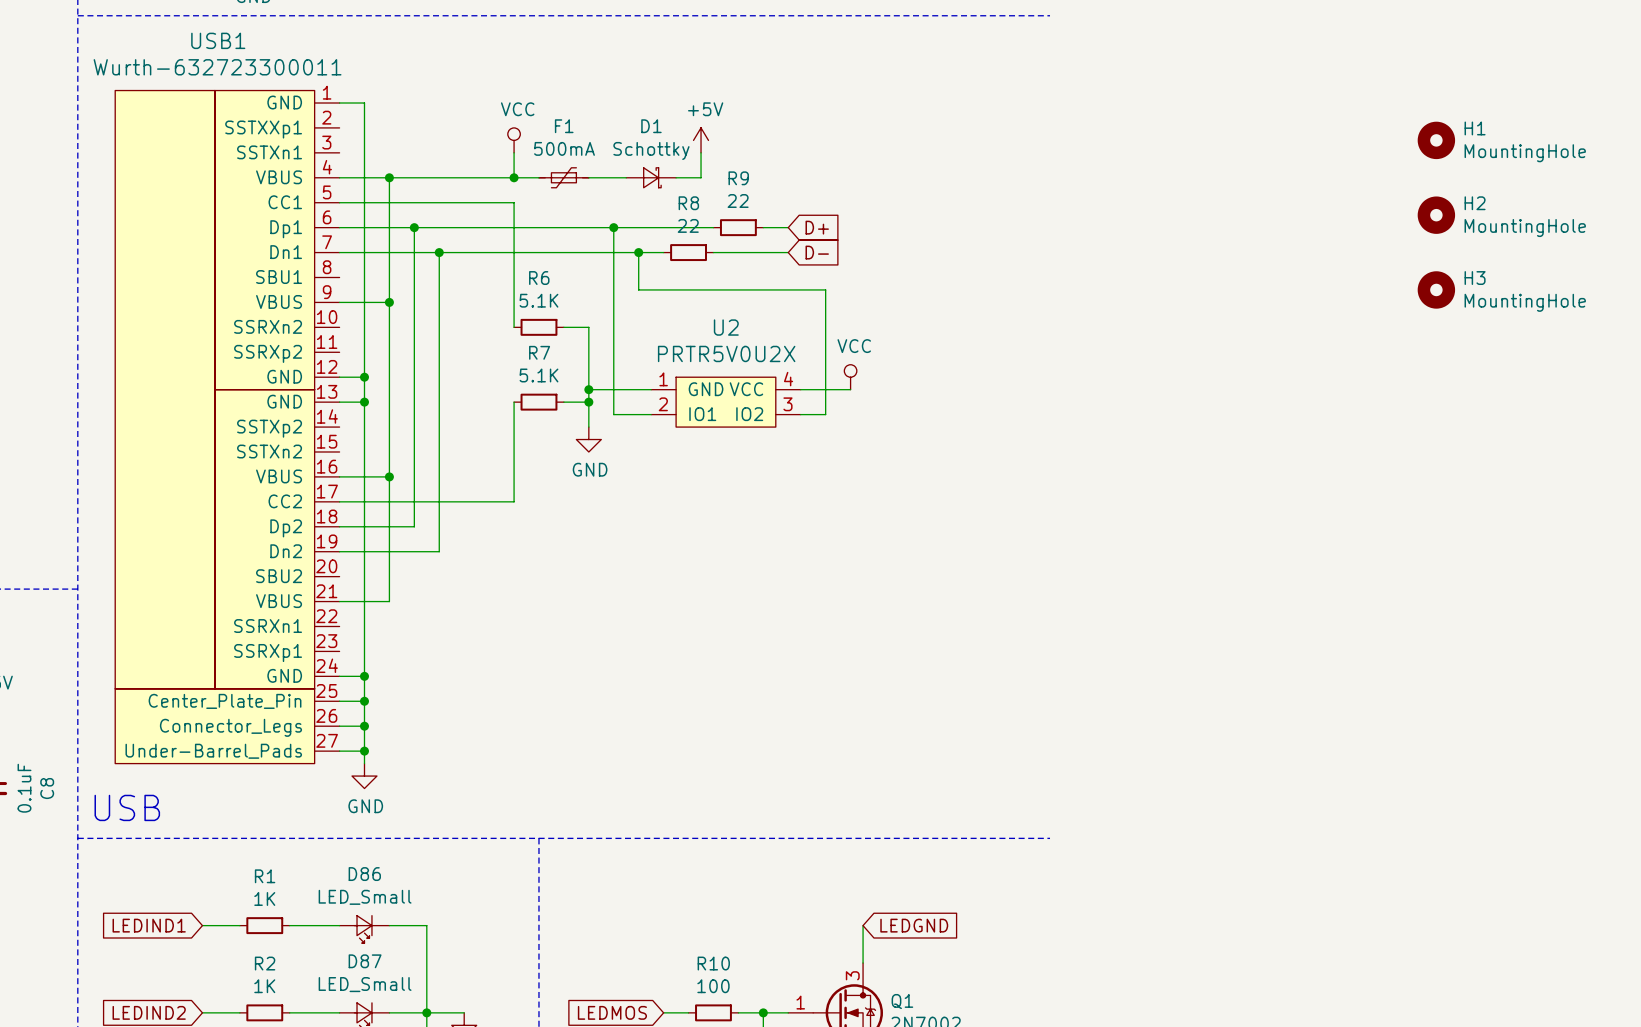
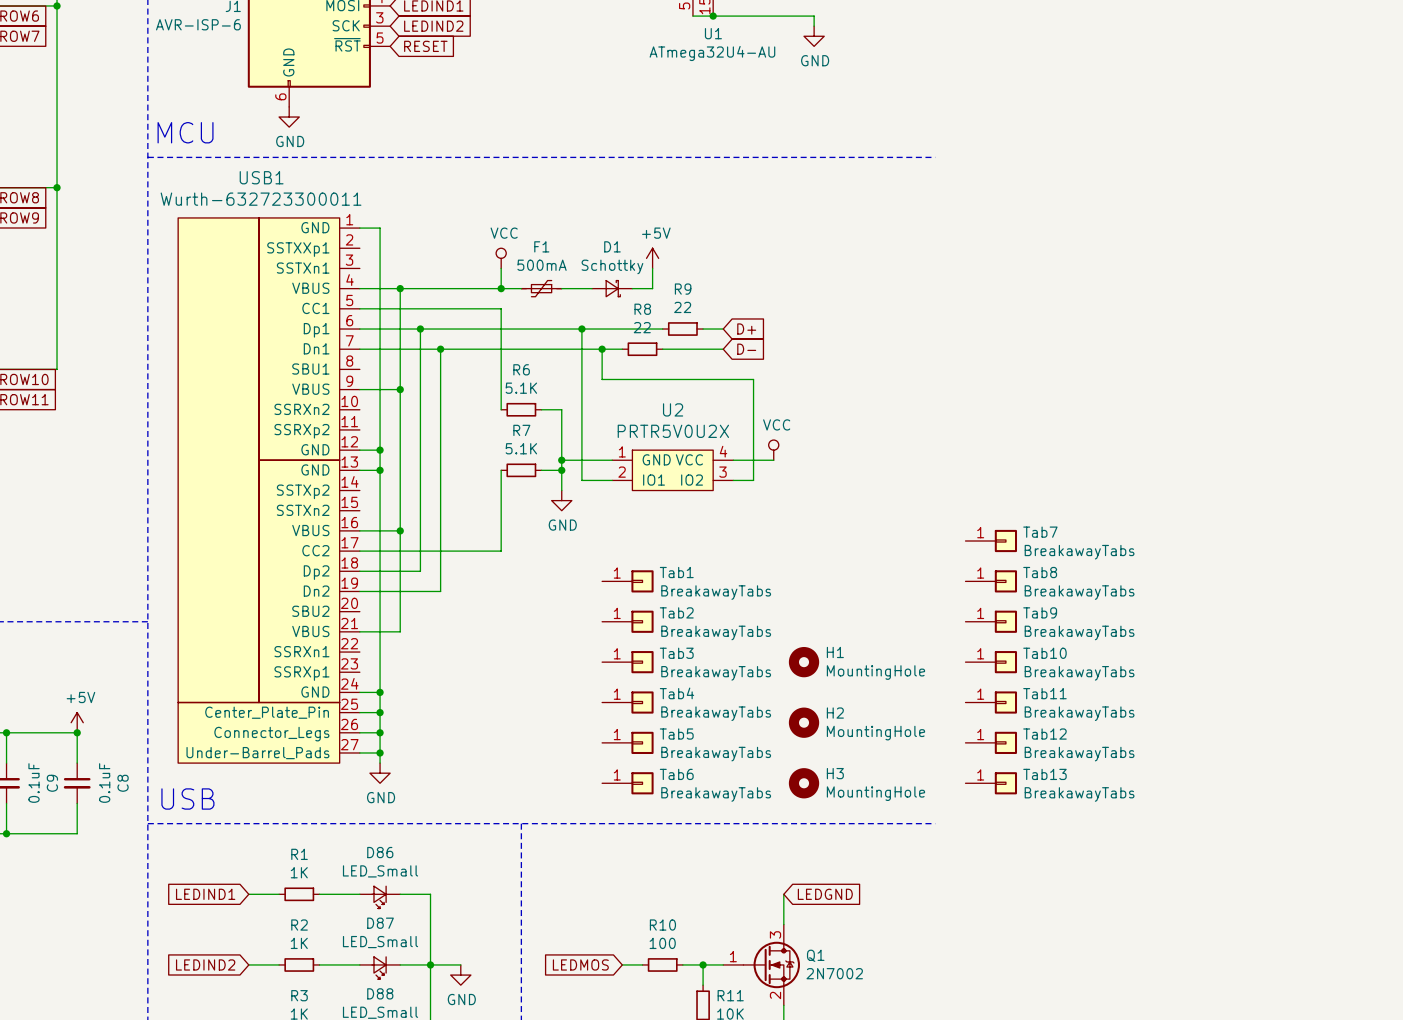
H1 position: (1436, 140) -> (804, 662)
H2 position: (1436, 215) -> (804, 722)
H3 position: (1436, 289) -> (804, 783)
Tab7: none -> BreakawayTabs (991, 541)
Tab1: none -> BreakawayTabs (627, 581)
Tab8: none -> BreakawayTabs (991, 581)
Tab2: none -> BreakawayTabs (627, 621)
Tab9: none -> BreakawayTabs (991, 621)
Tab3: none -> BreakawayTabs (627, 662)
Tab10: none -> BreakawayTabs (991, 662)
Tab4: none -> BreakawayTabs (627, 702)
Tab11: none -> BreakawayTabs (991, 702)
Tab5: none -> BreakawayTabs (627, 742)
Tab12: none -> BreakawayTabs (991, 742)
Tab6: none -> BreakawayTabs (627, 783)
Tab13: none -> BreakawayTabs (991, 783)

